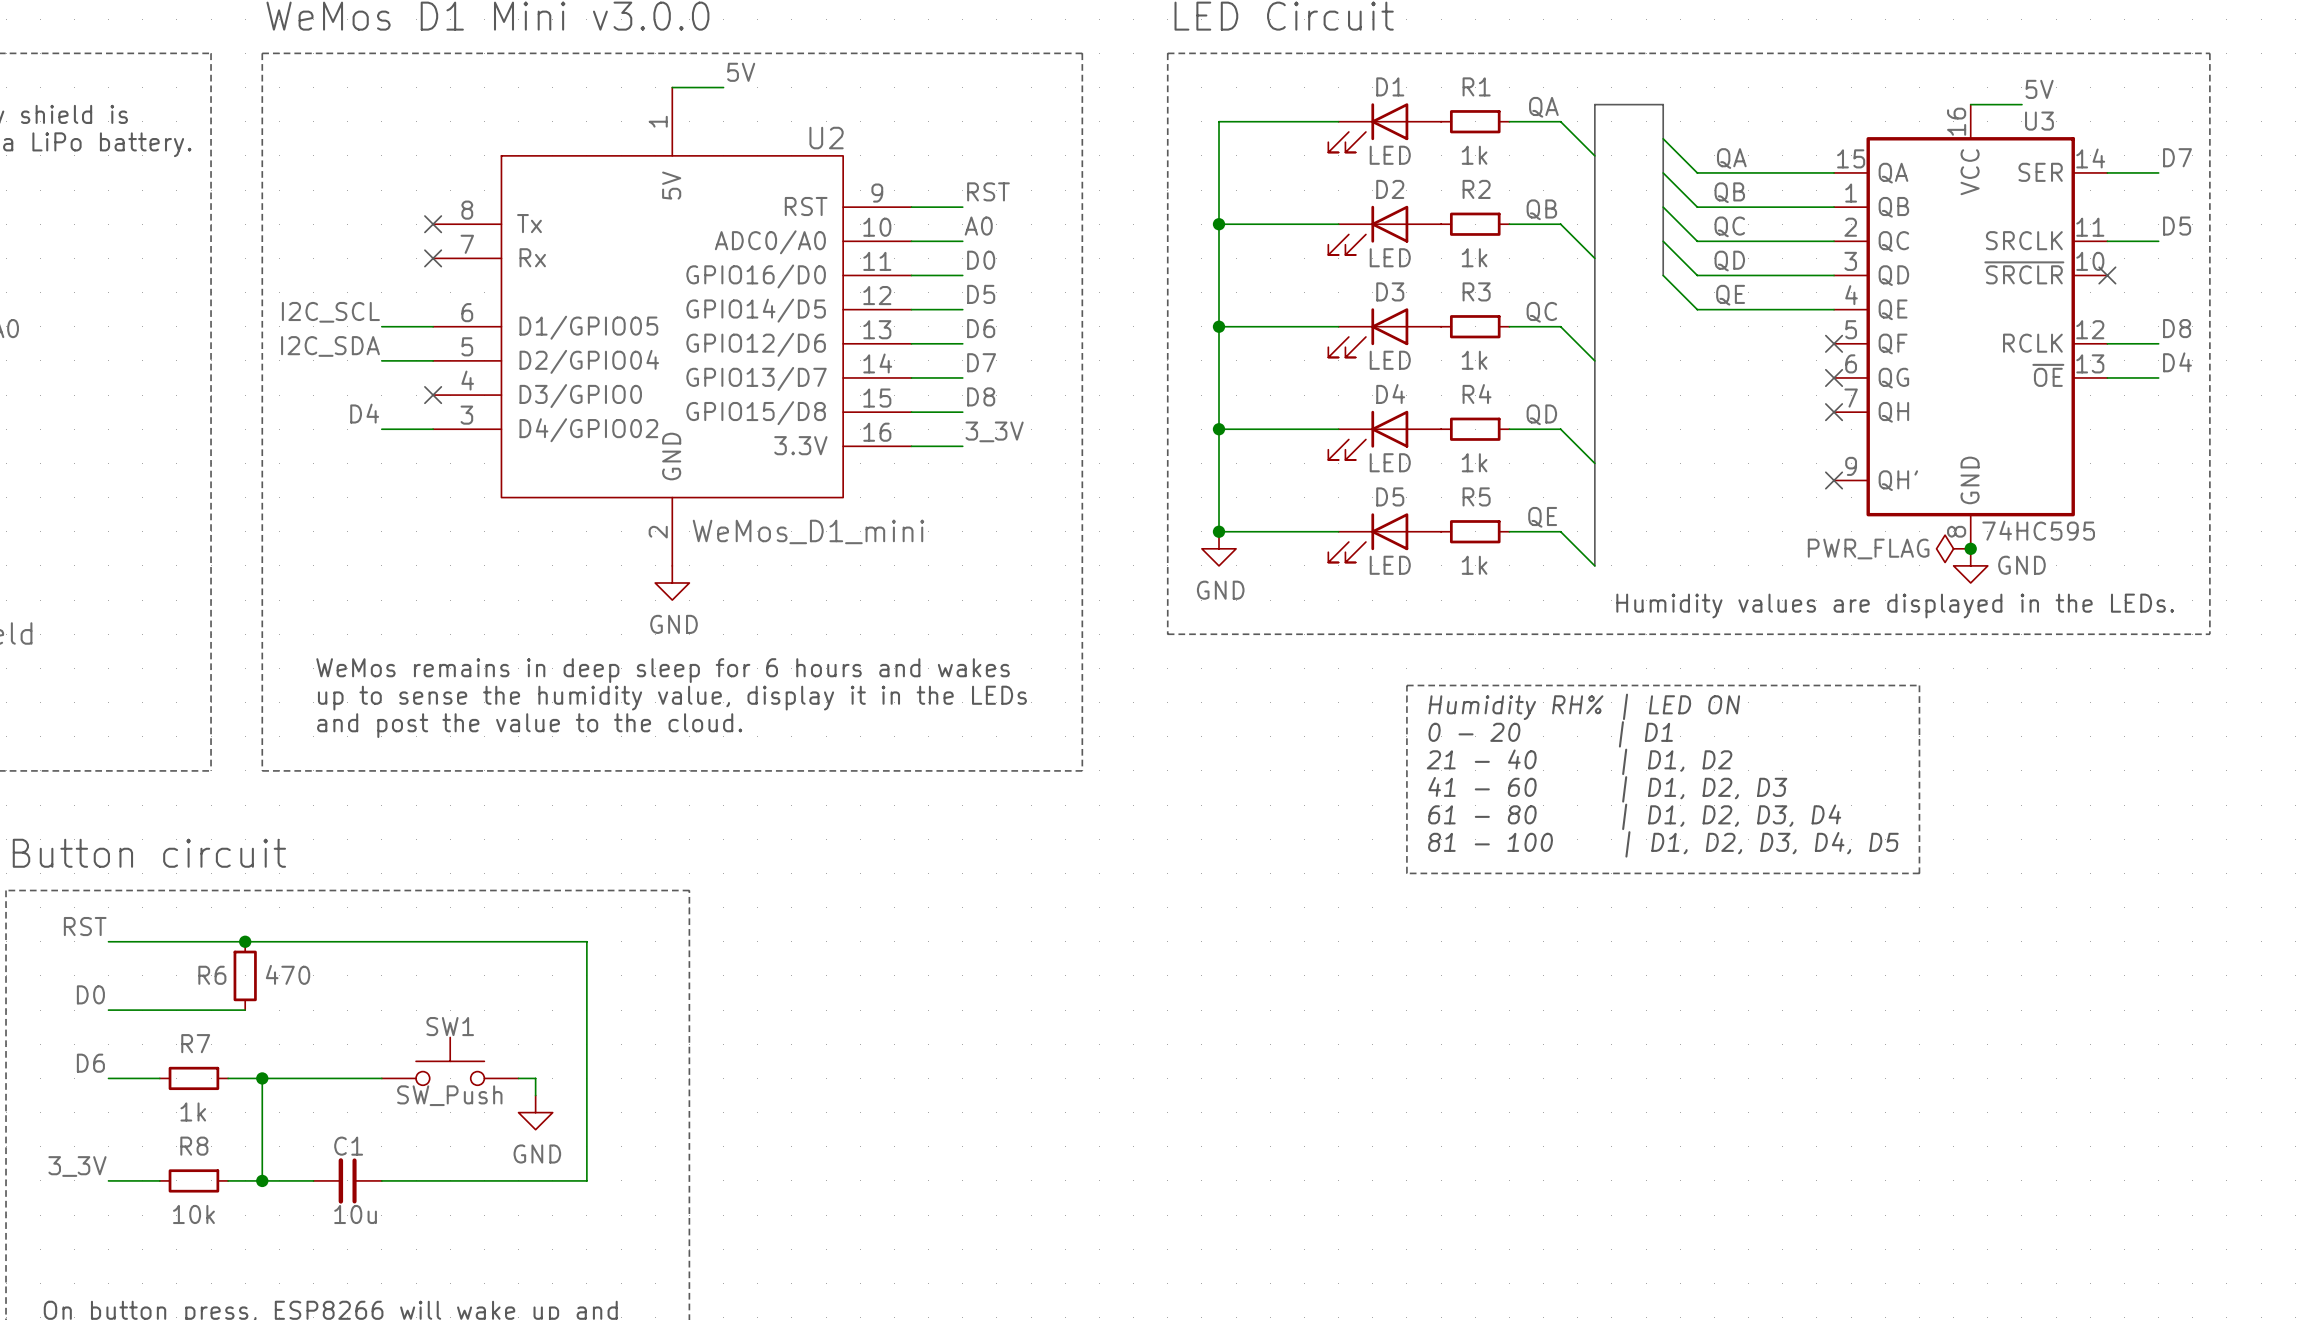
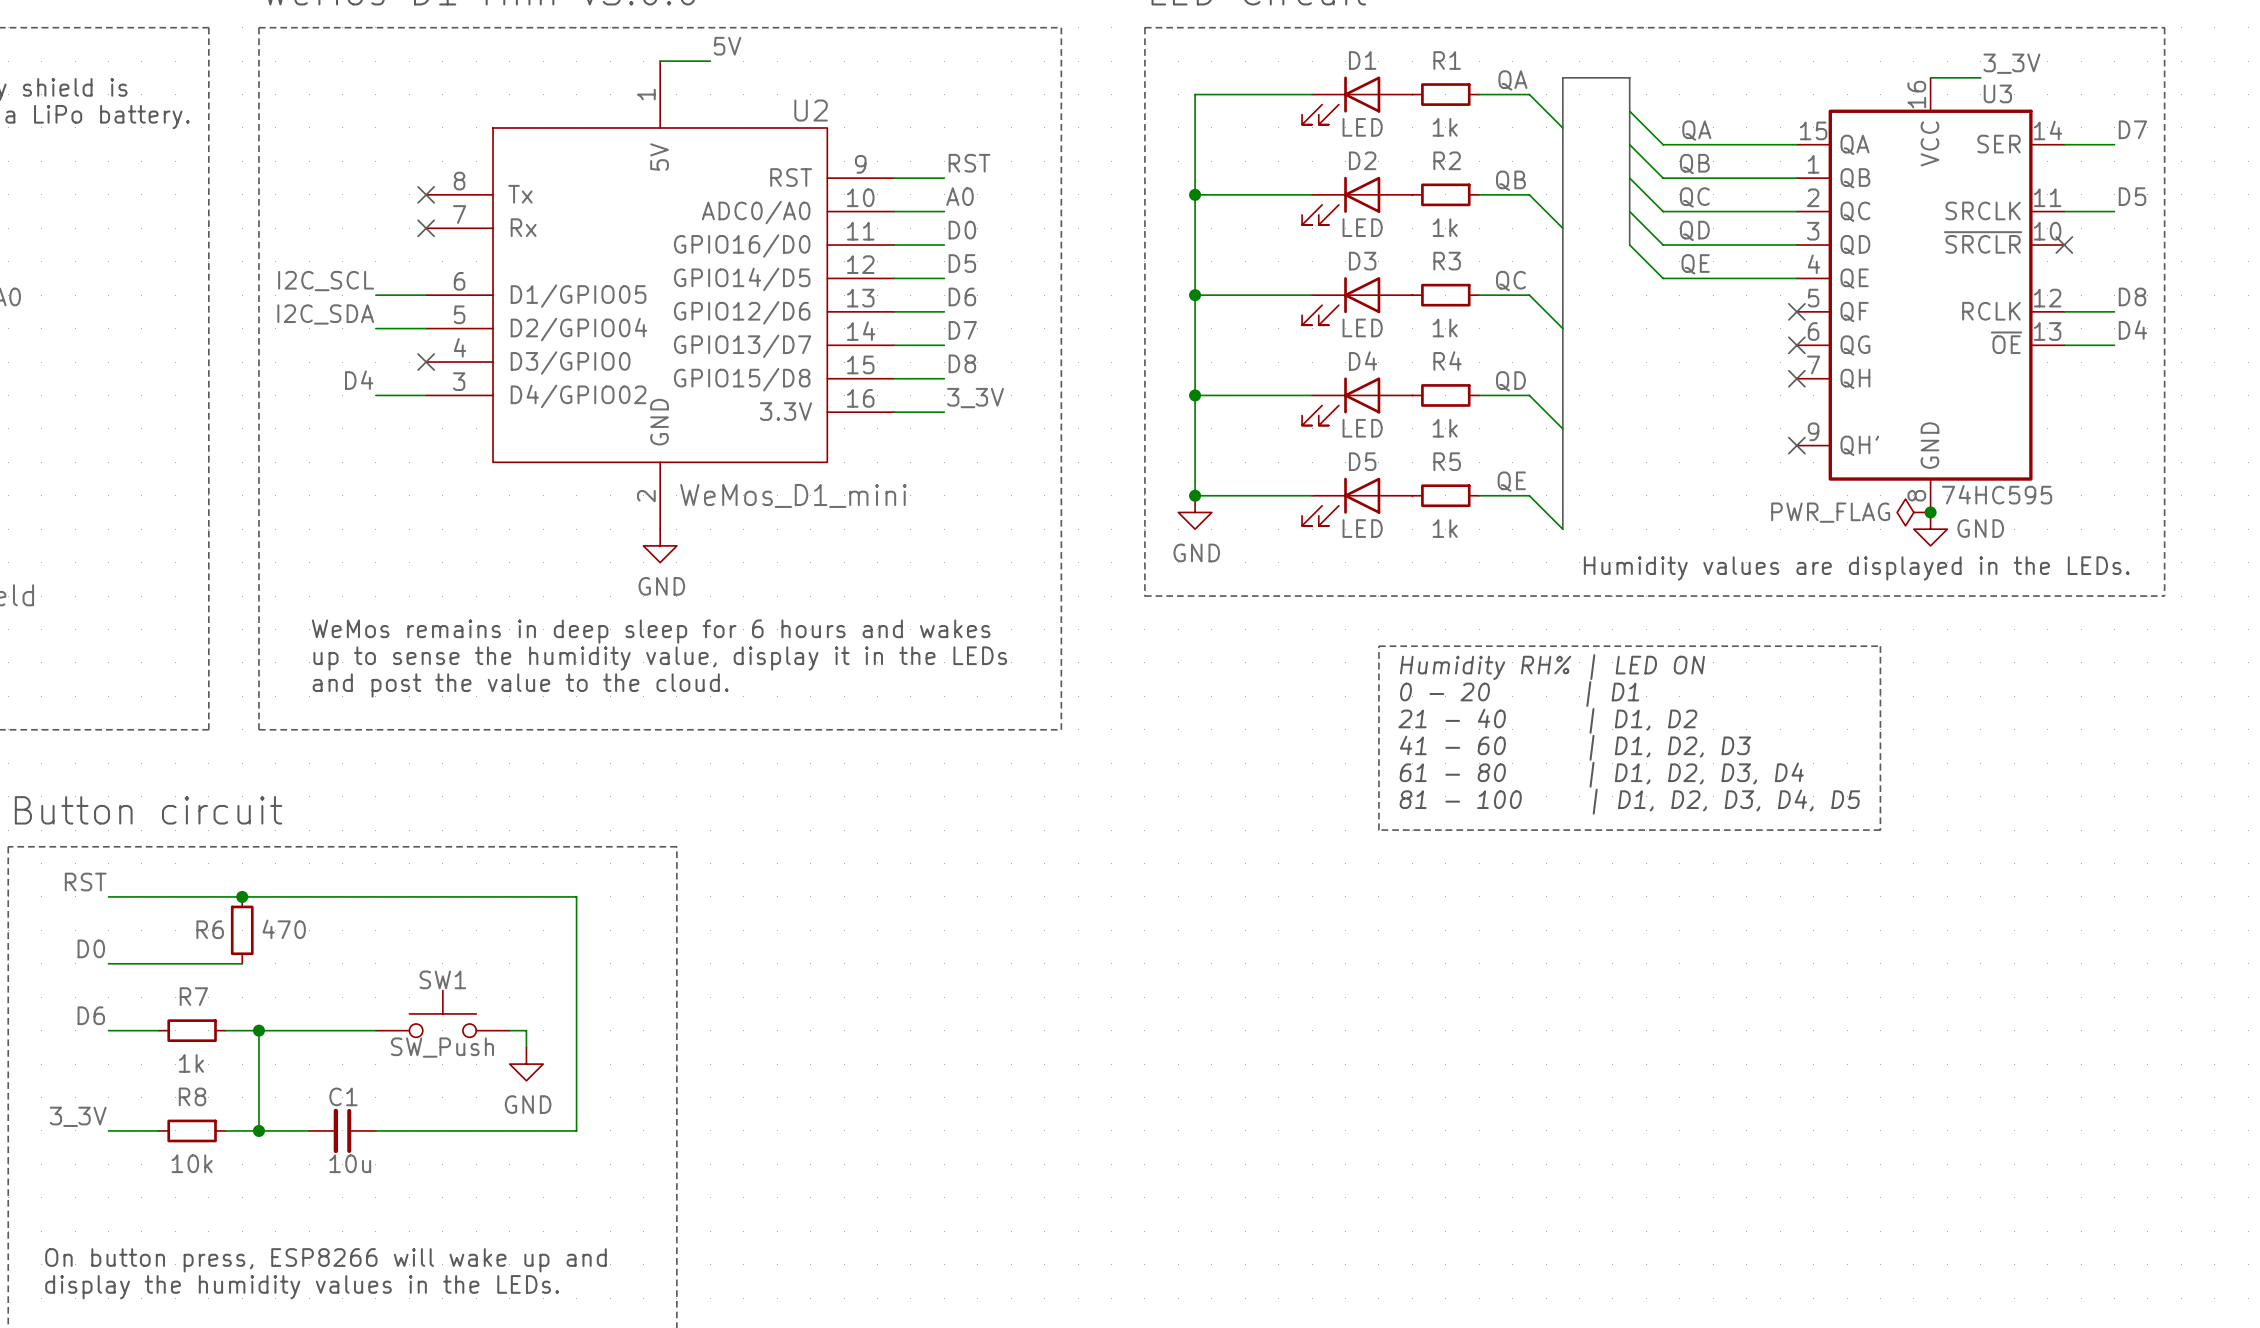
label: 5V (2039, 89) -> 3_3V (2011, 63)

